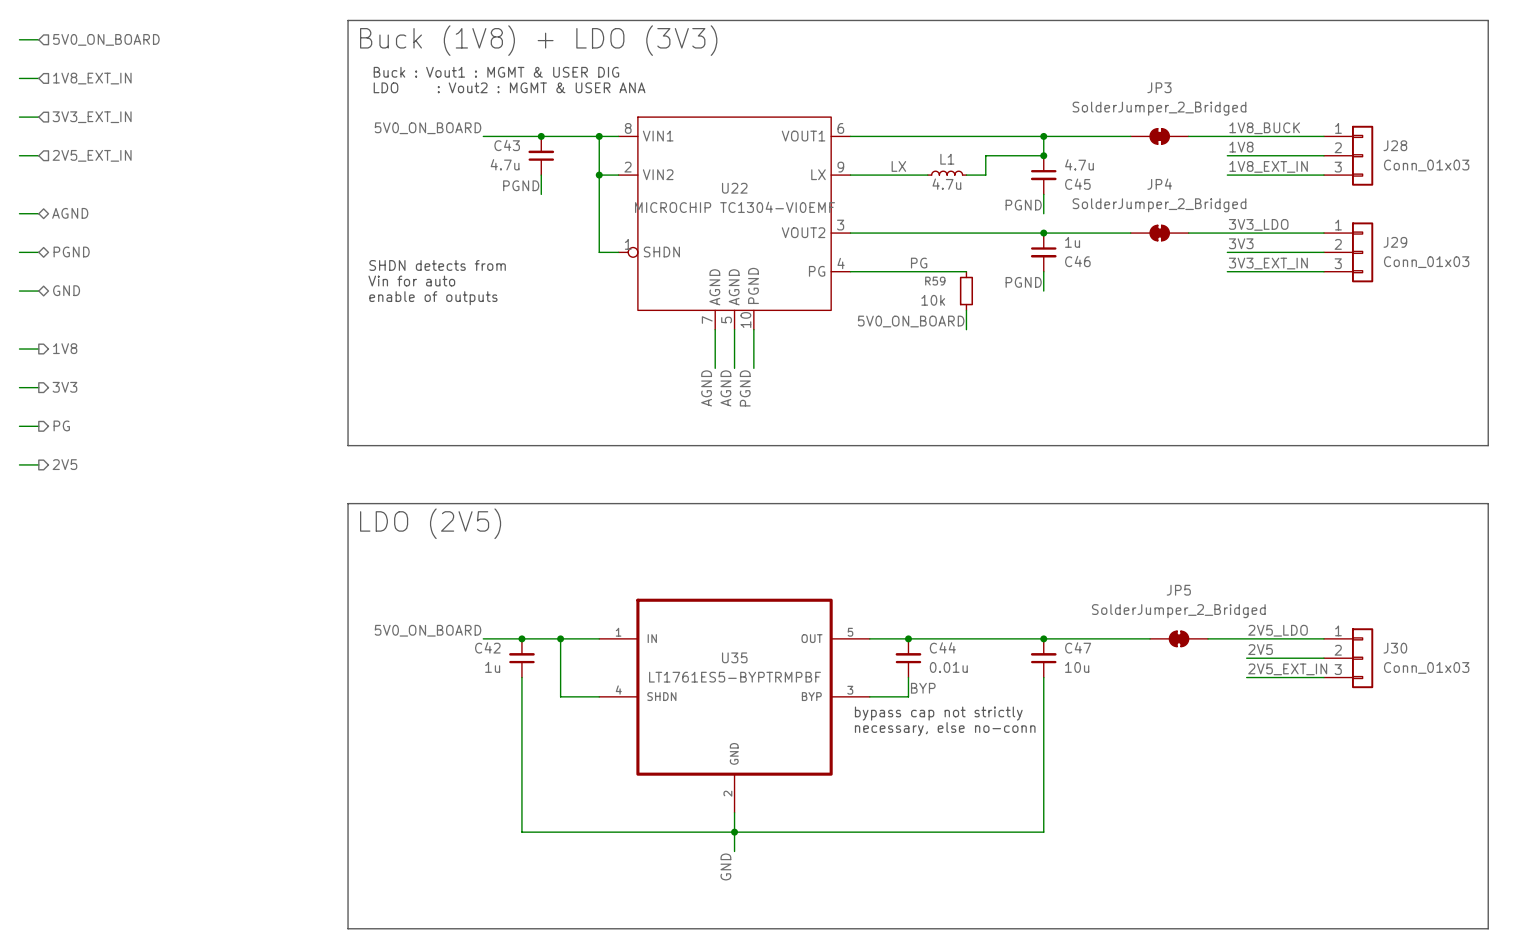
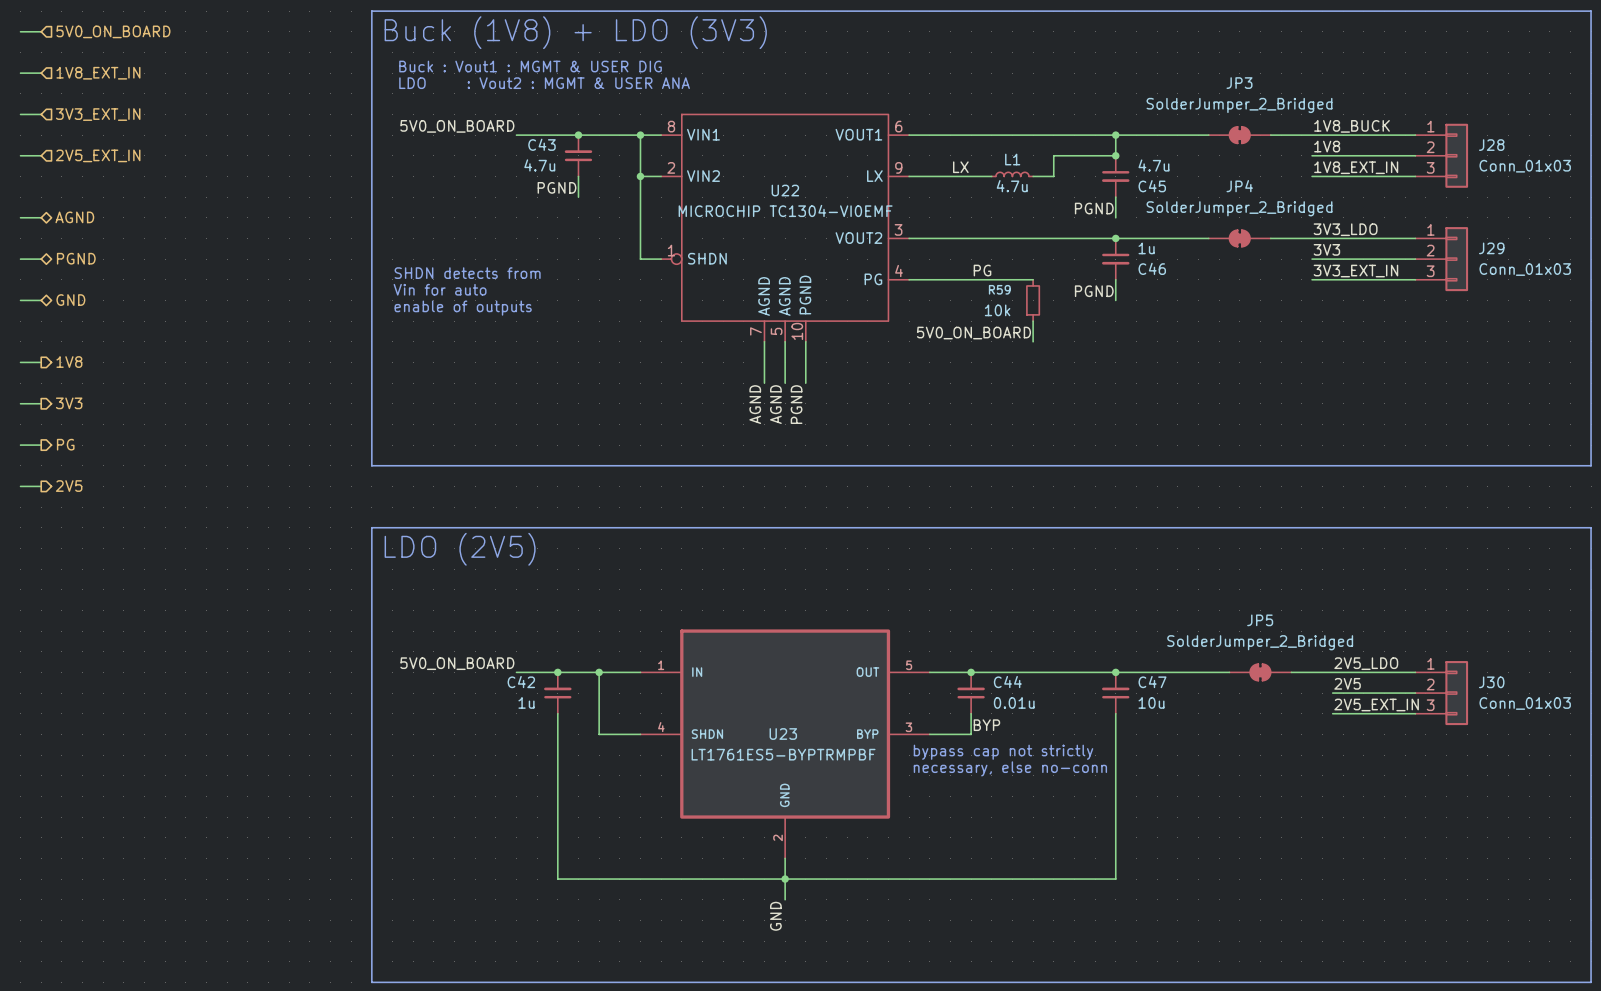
U35 name: U35 (734, 657) -> U23 (783, 734)
U35 value position: LT1761ES5-BYPTRMPBF (735, 677) -> LT1761ES5-BYPTRMPBF (783, 754)

